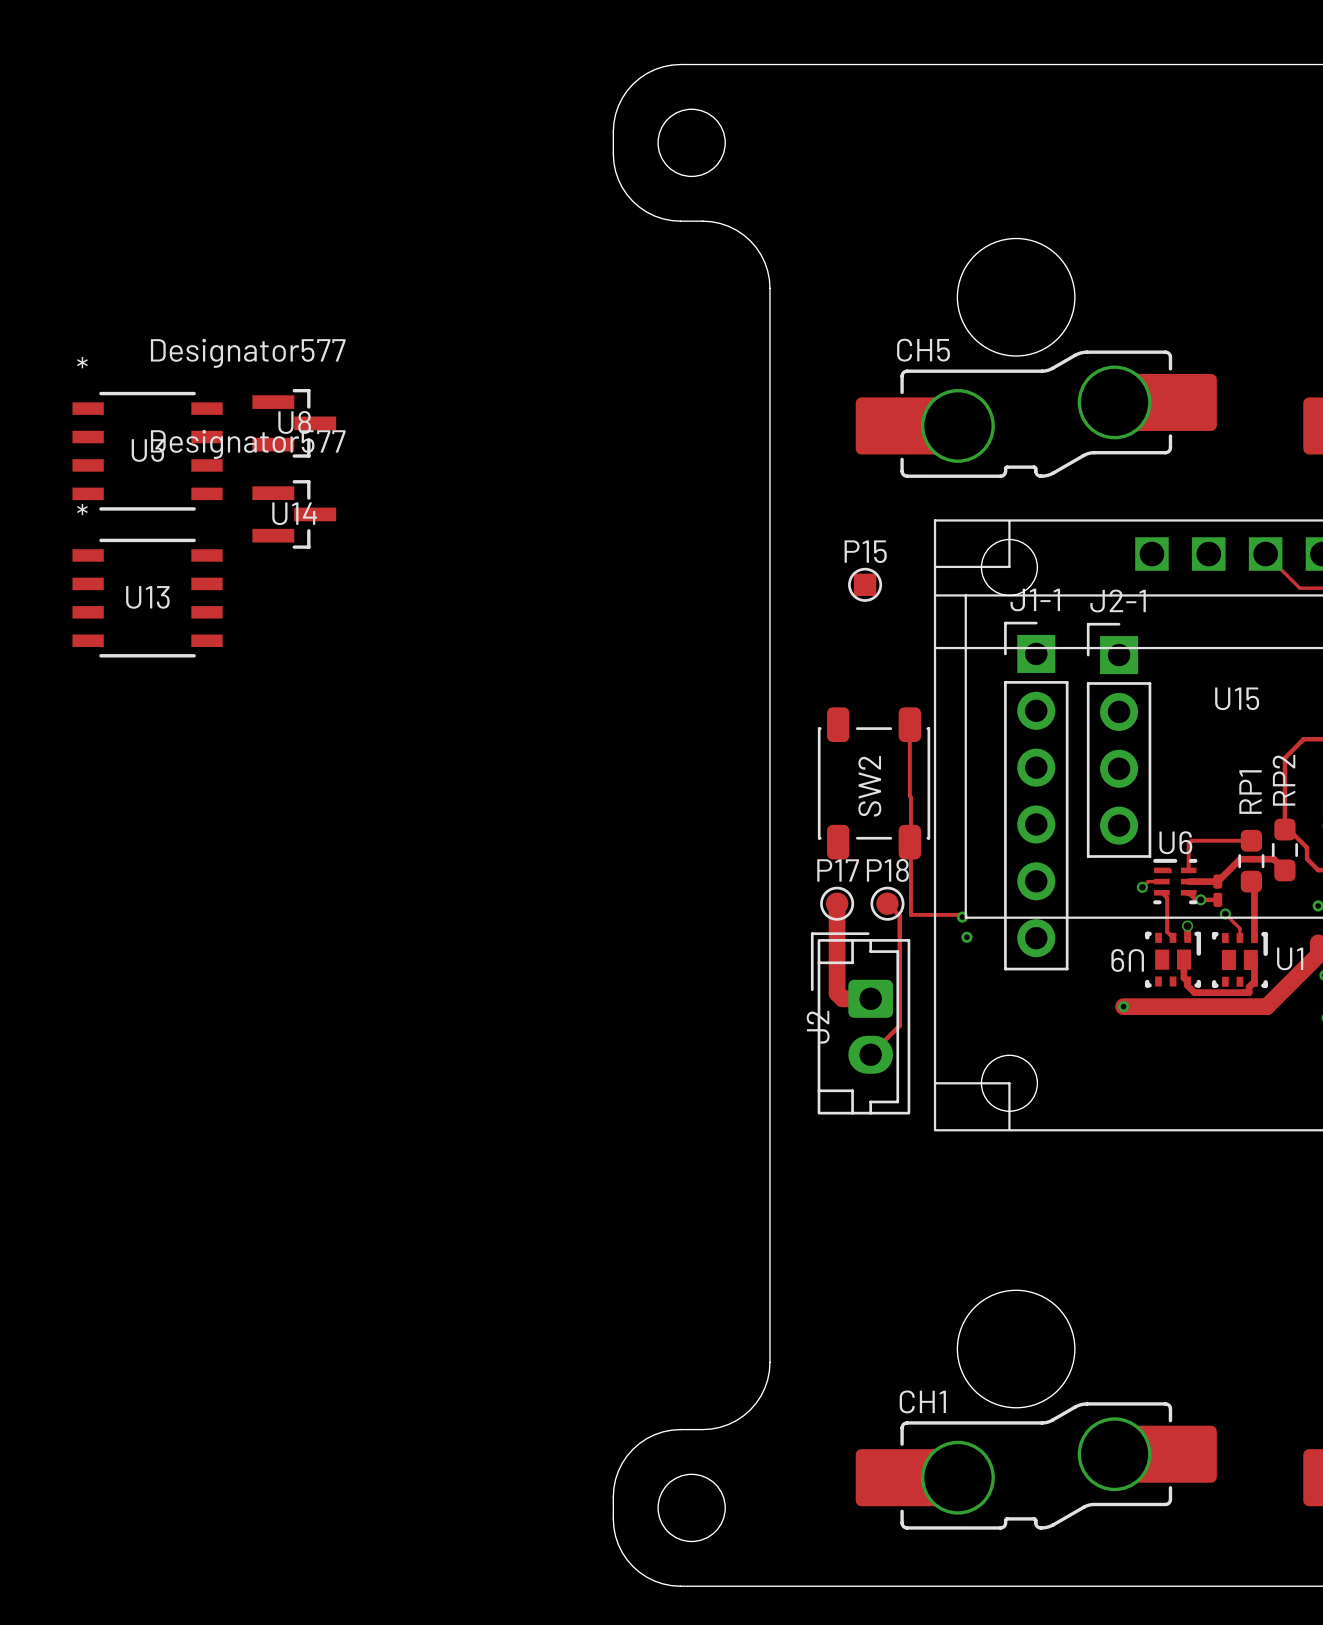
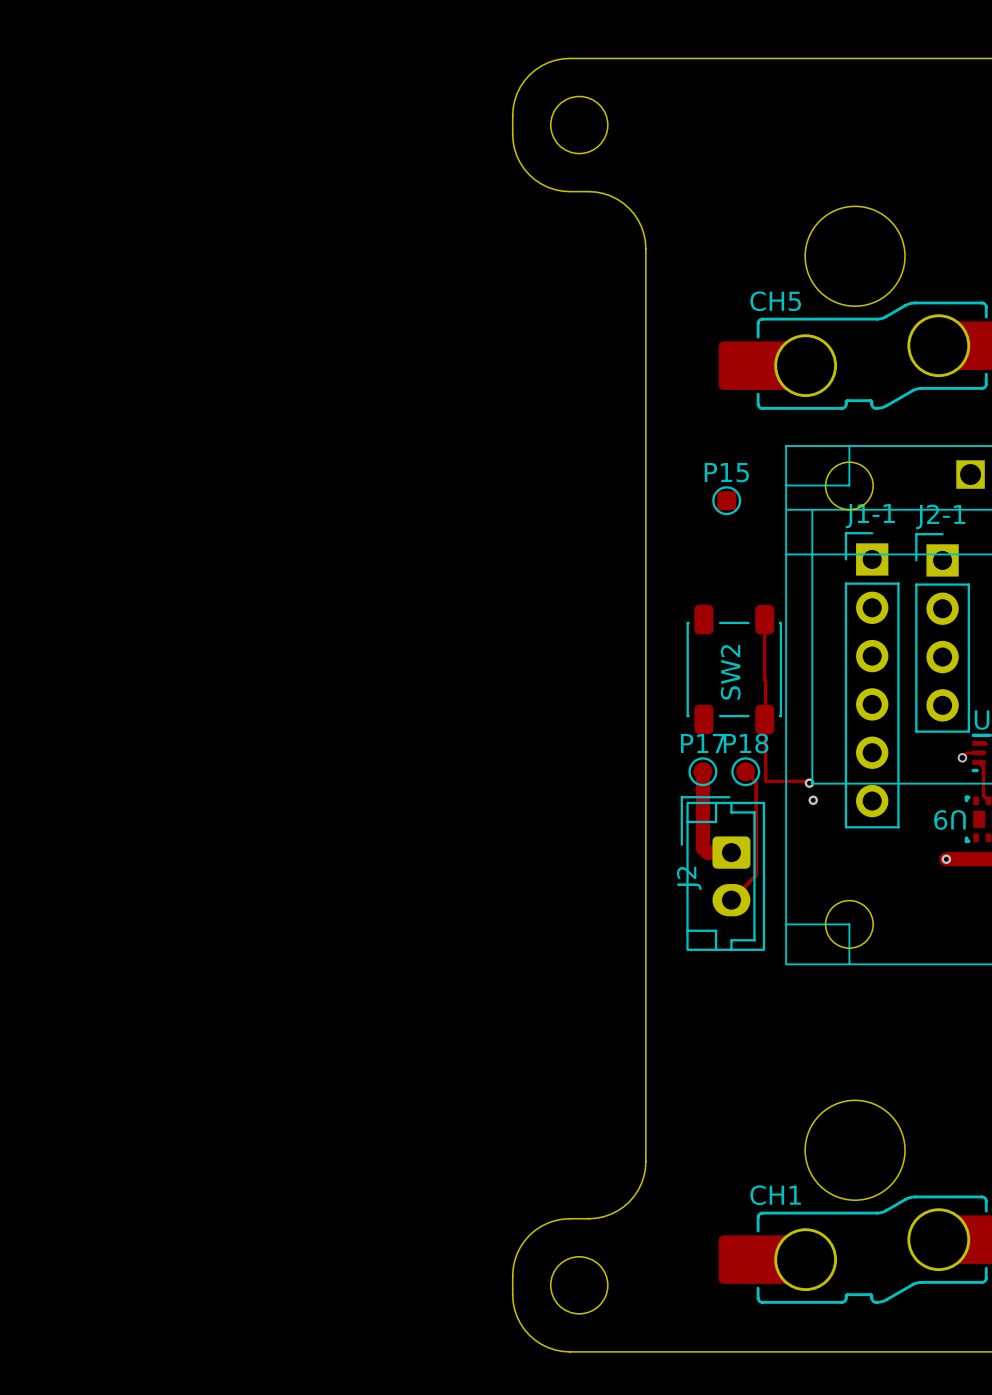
U8: (294, 423) -> none
U3: (147, 451) -> none
U14: (294, 514) -> none
U13: (147, 598) -> none

